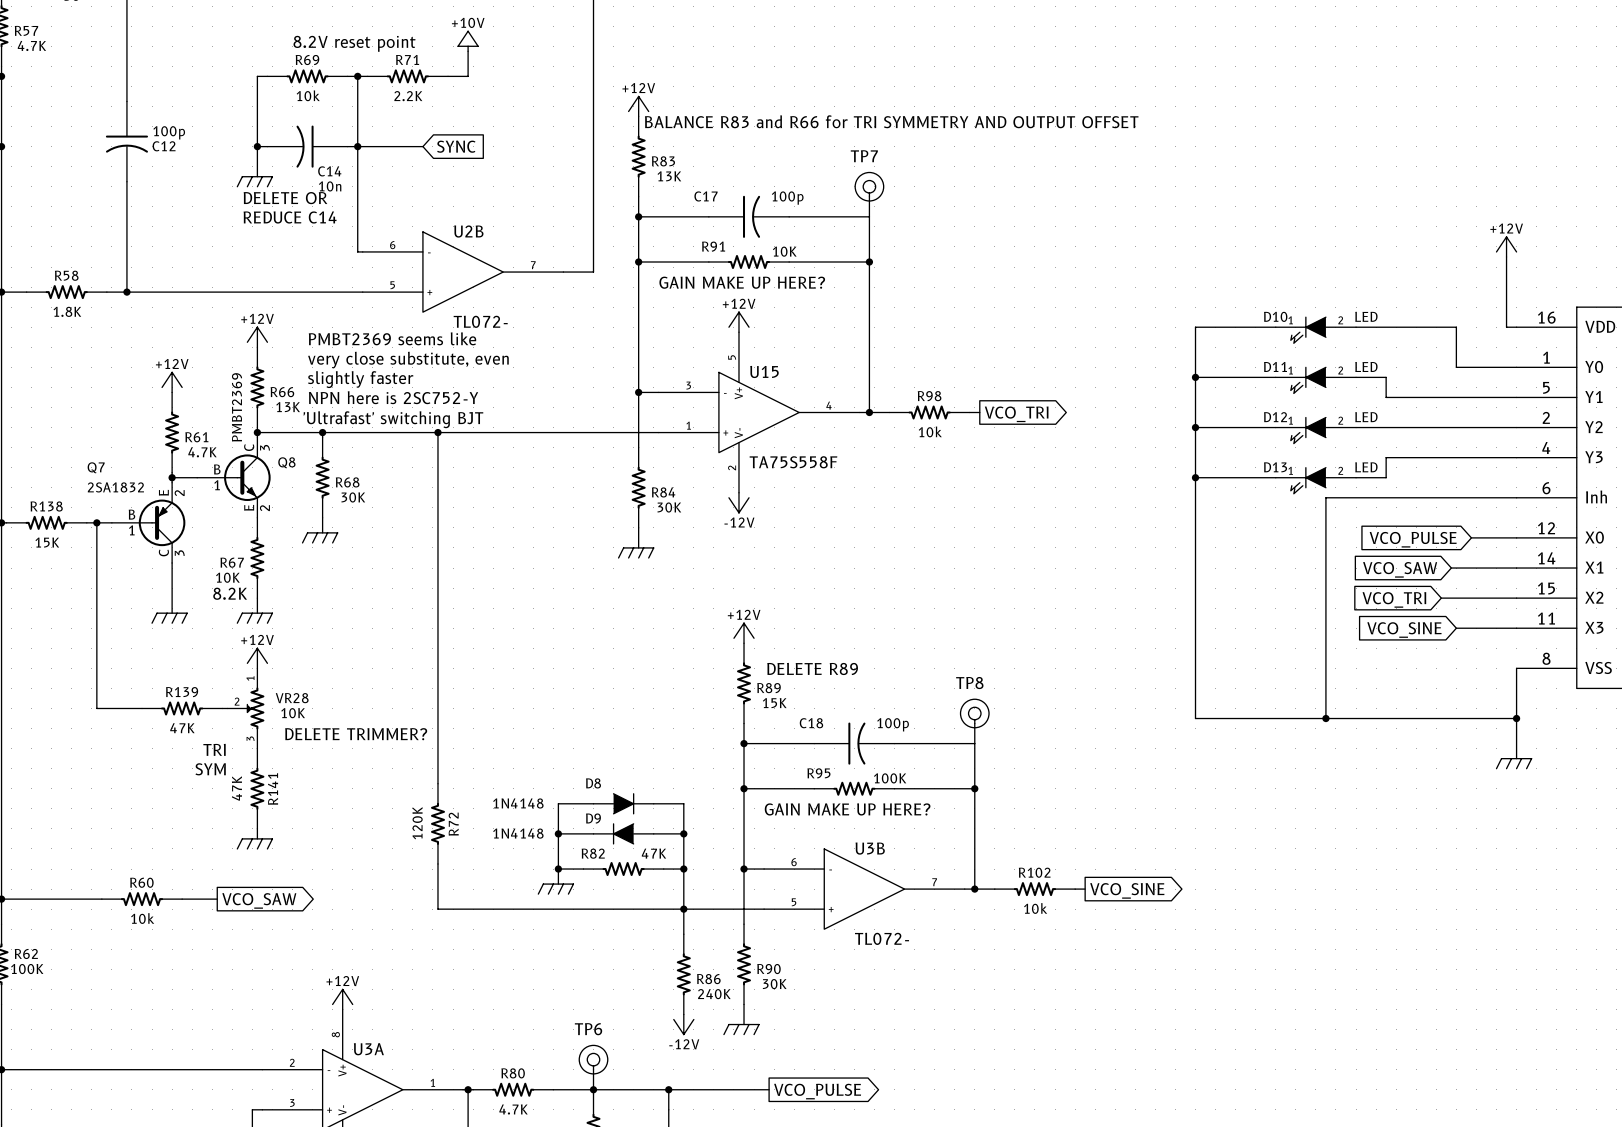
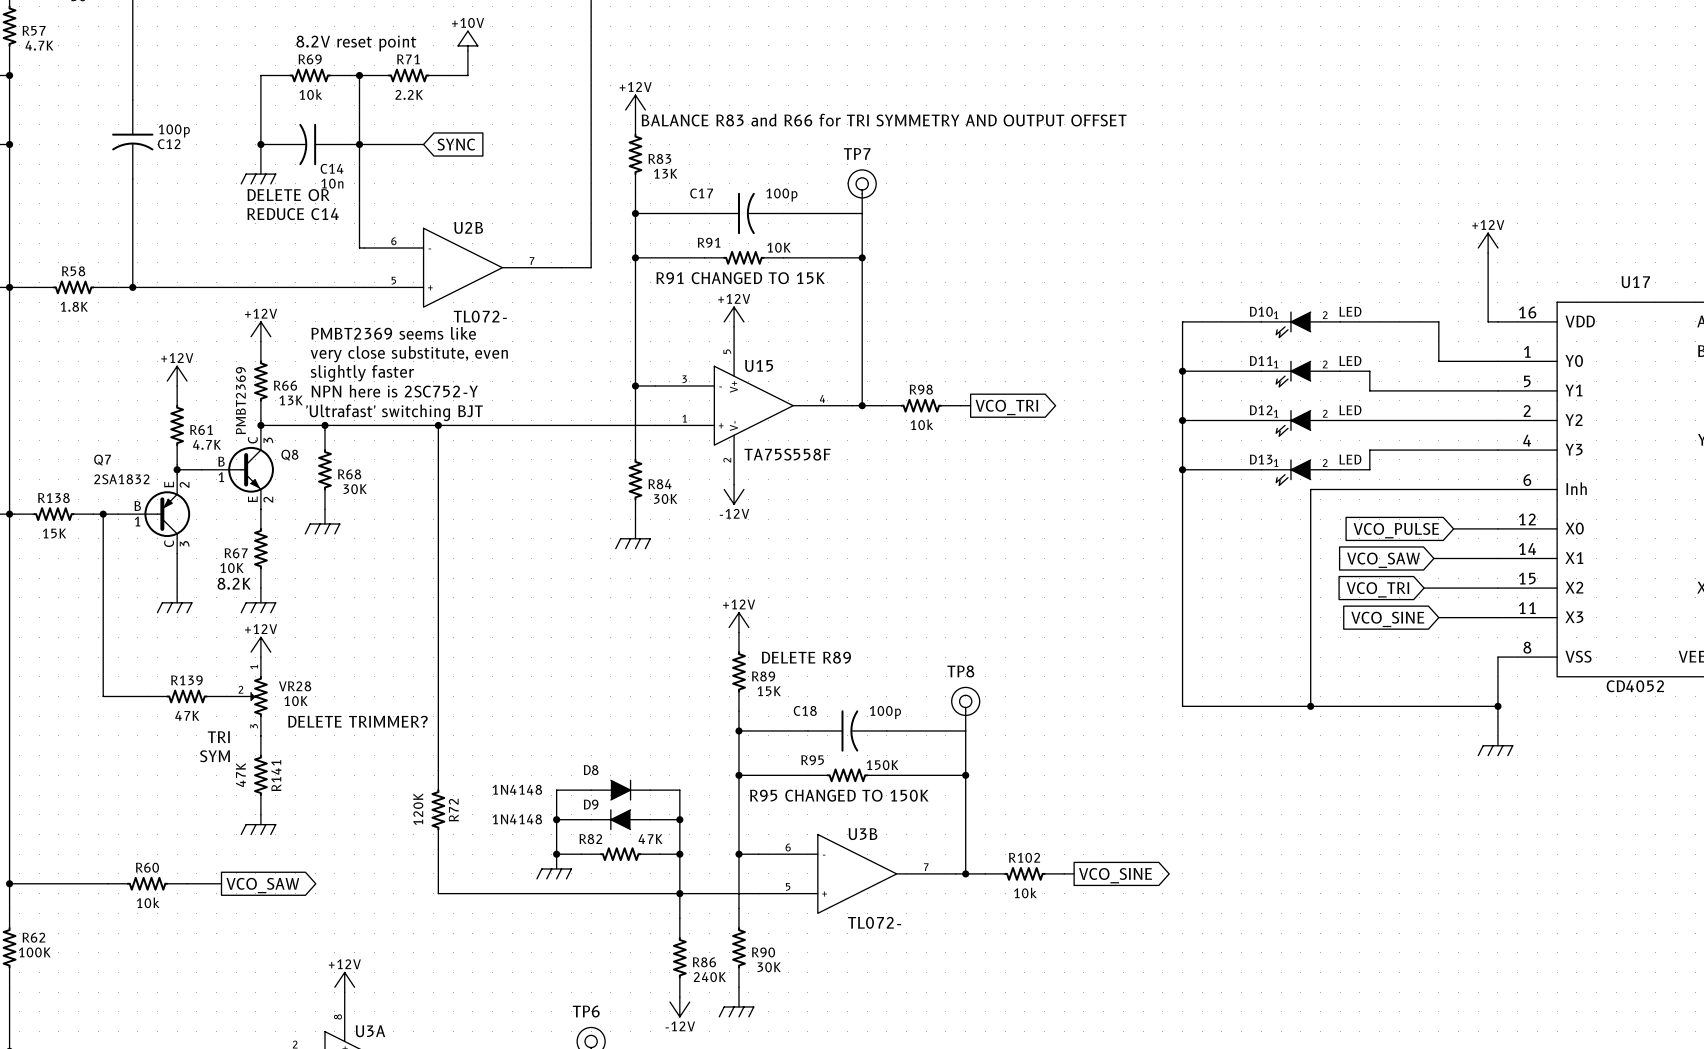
text: GAIN MAKE UP HERE? (742, 282) -> R91 CHANGED TO 15K (740, 278)
R95 value: 100K (890, 778) -> 150K (882, 765)
text: none -> R95 CHANGED TO 150K (839, 795)
text: GAIN MAKE UP HERE? (847, 809) -> none

